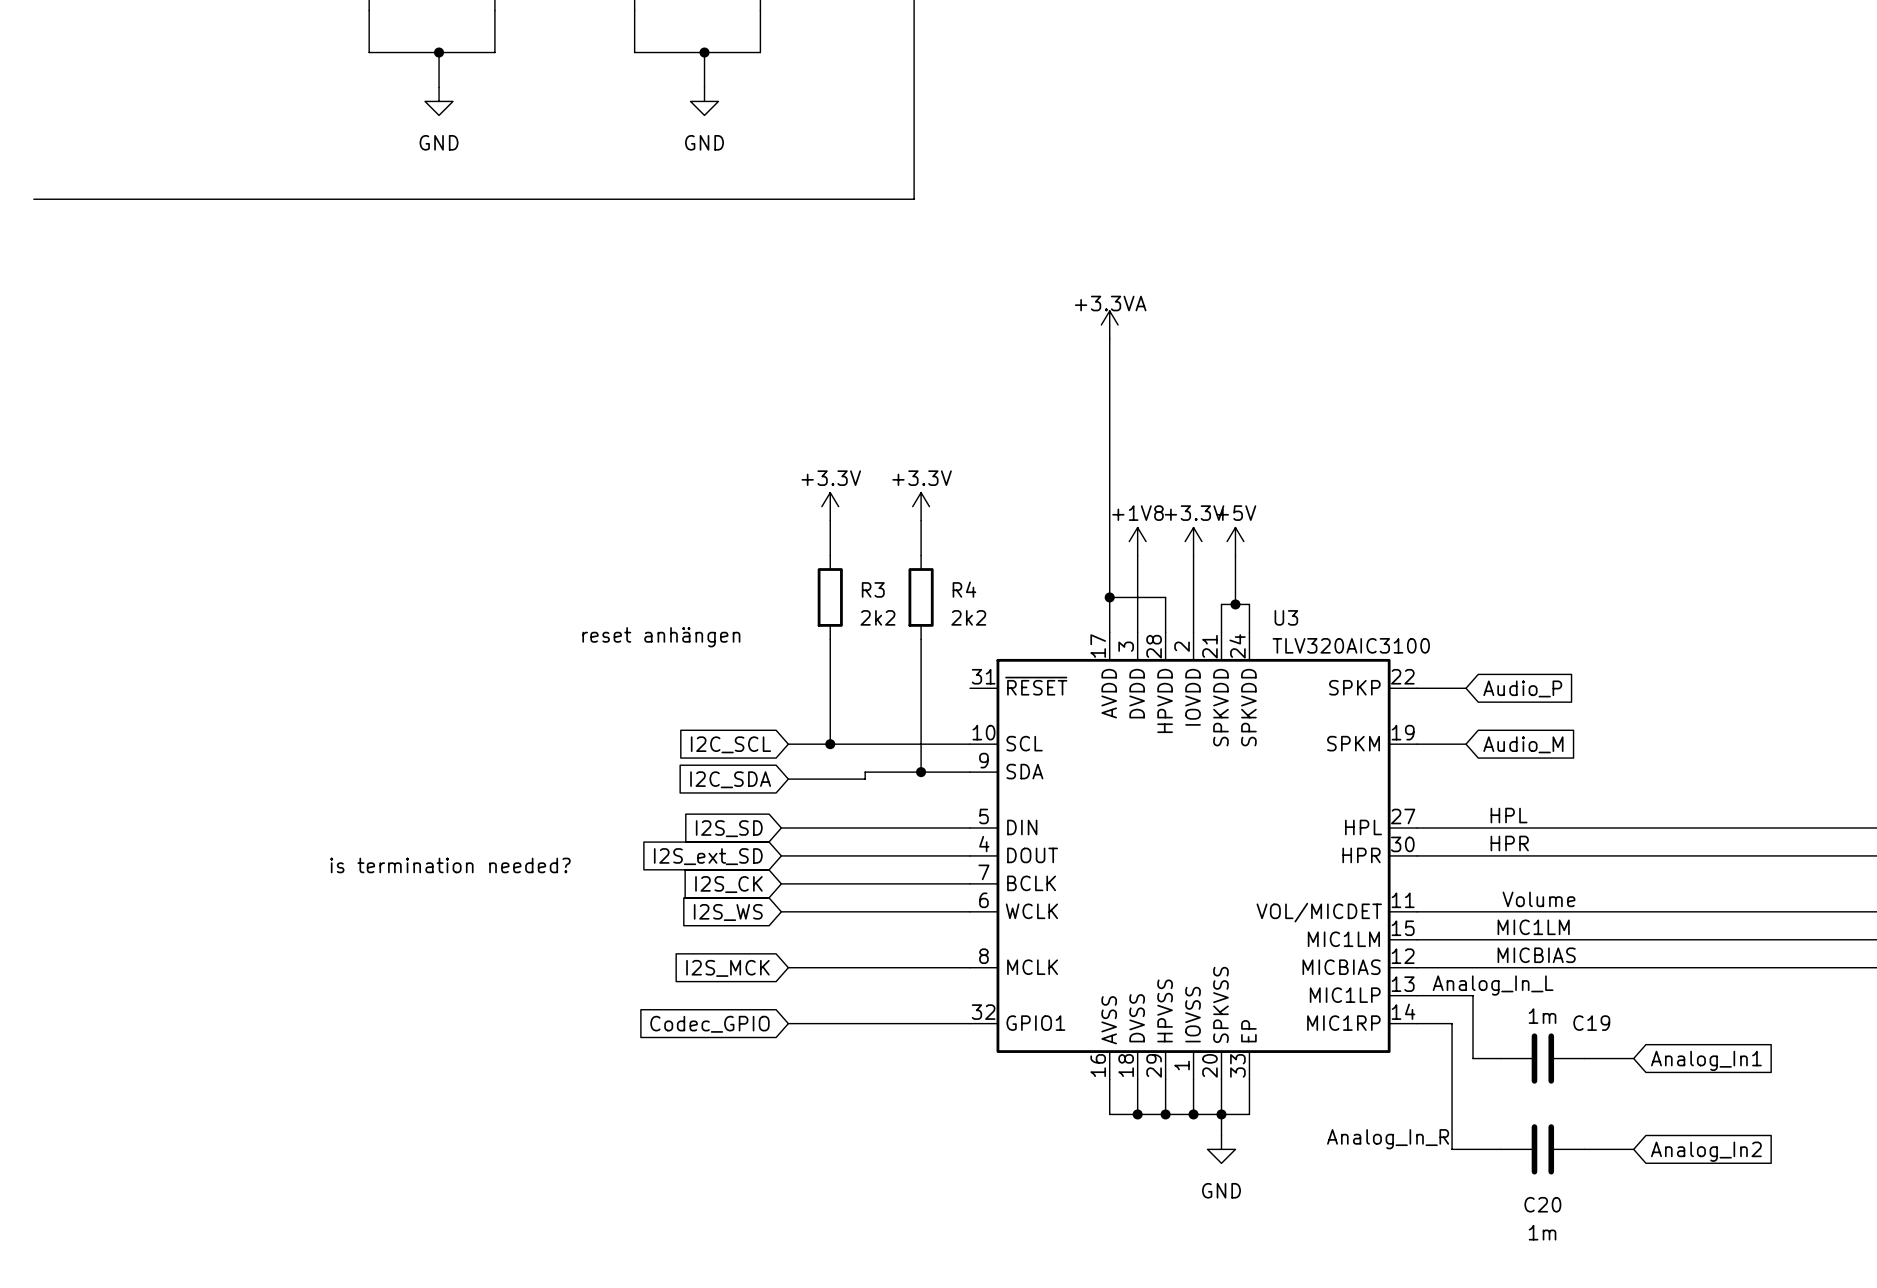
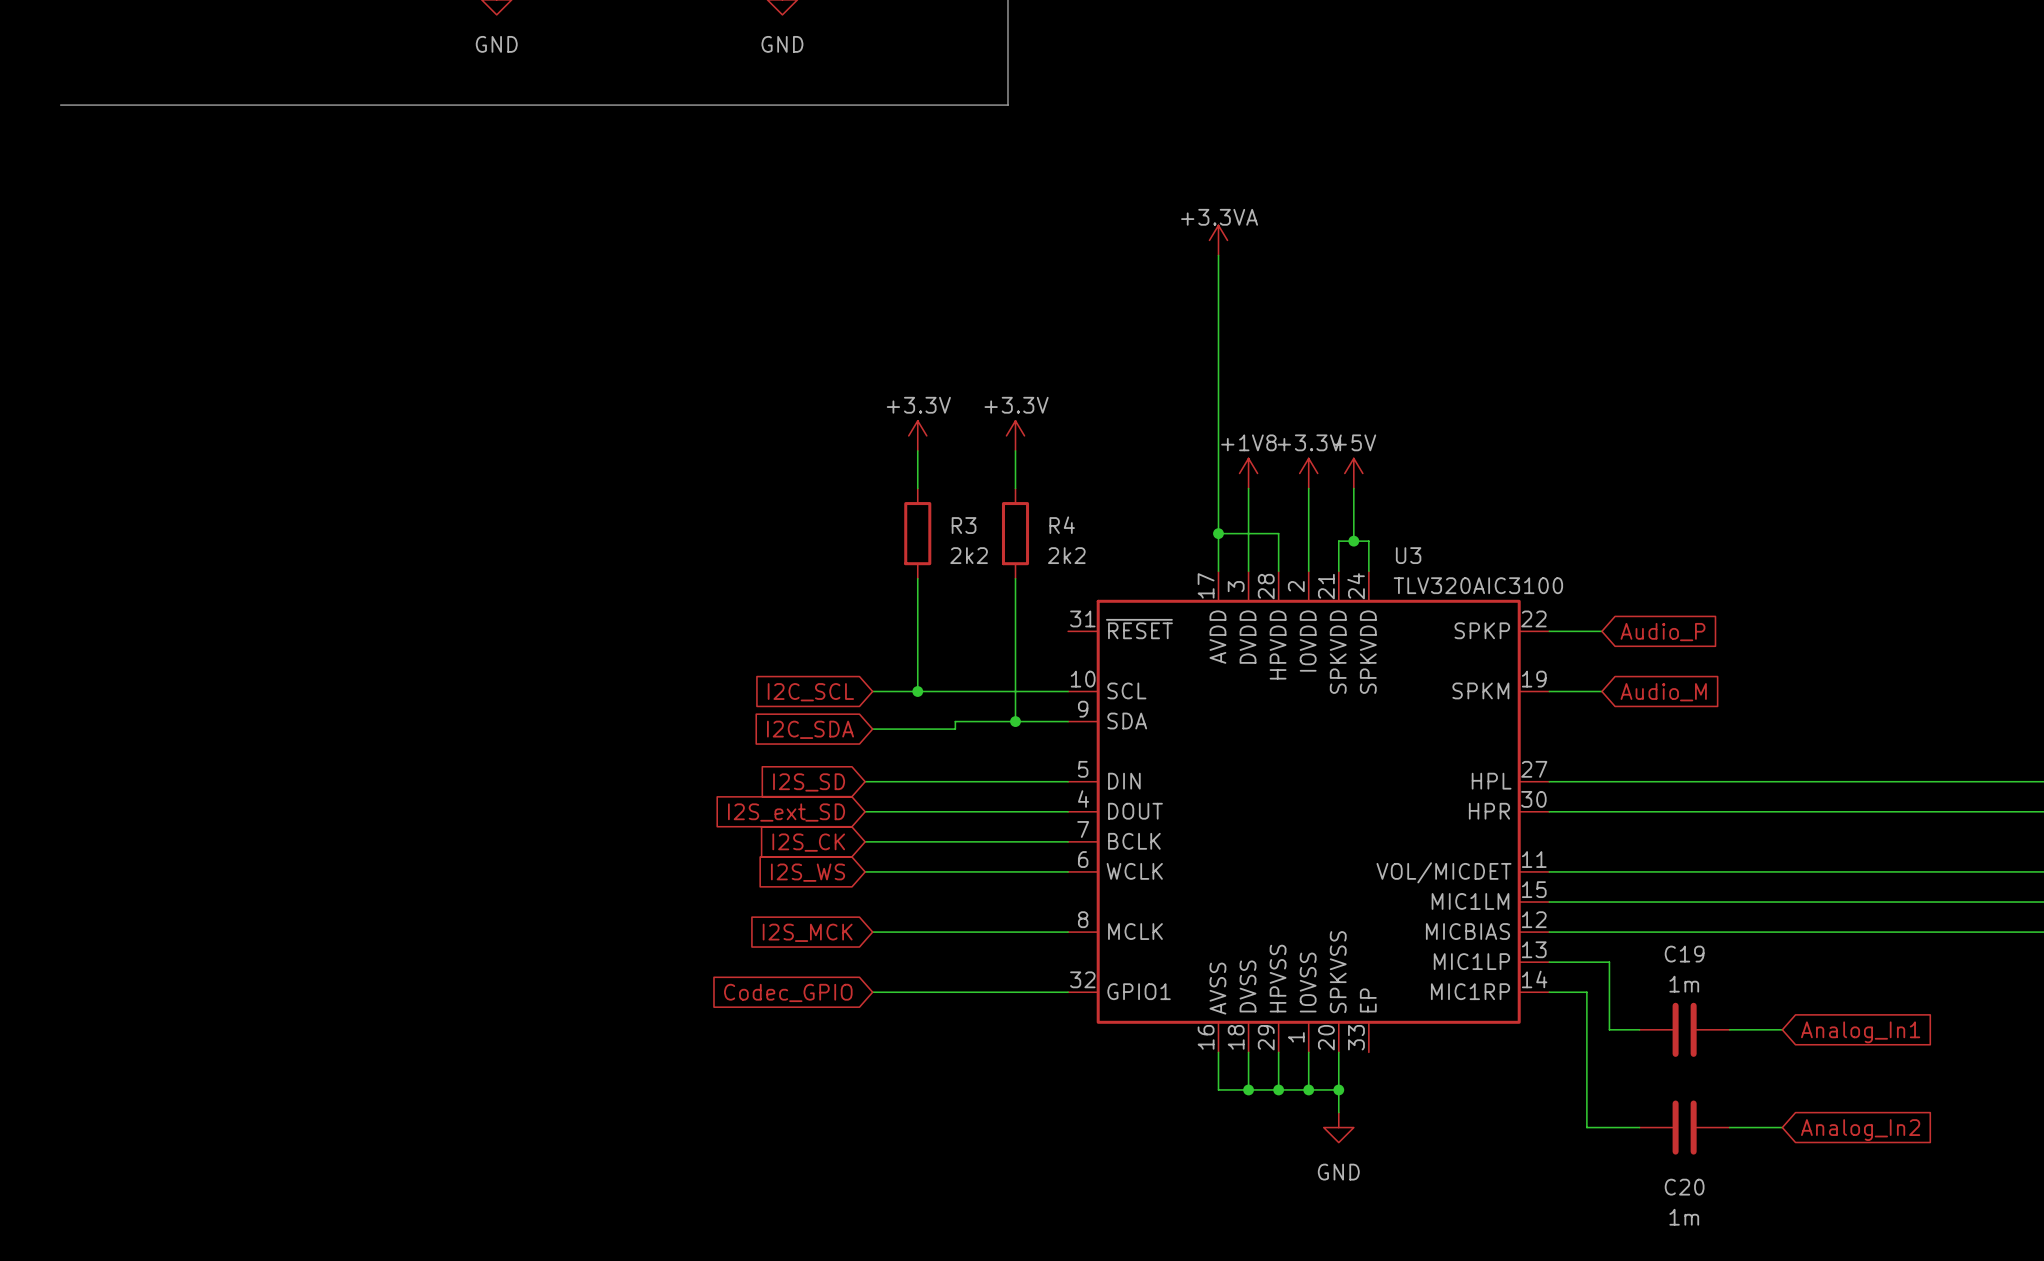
text: reset anhängen (661, 637) -> none
label: HPL (1509, 815) -> none
label: HPR (1509, 843) -> none
text: is termination needed? (450, 865) -> none
label: Volume (1538, 899) -> none
label: MIC1LM (1533, 927) -> none
label: MICBIAS (1536, 955) -> none
label: Analog_In_L (1493, 985) -> none
C19 name position: C19 (1591, 1023) -> C19 (1684, 954)
wire: (1249, 1079) (1249, 1114) (1221, 1114) -> none
label: Analog_In_R (1388, 1139) -> none

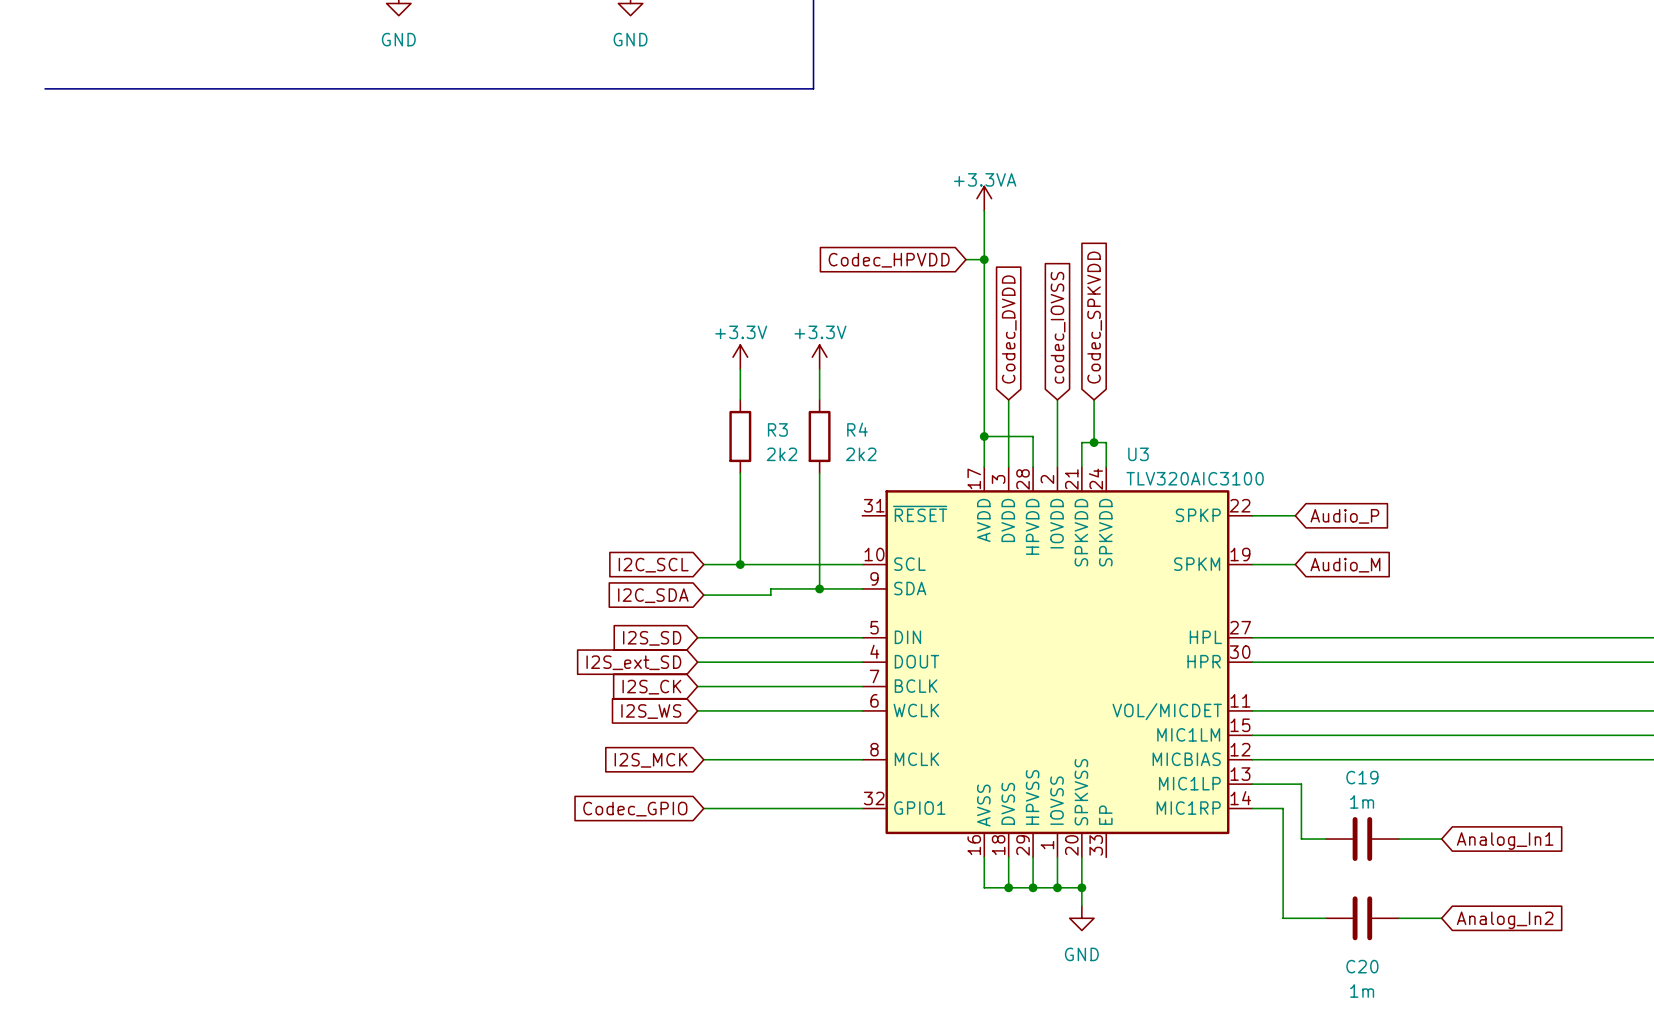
wire: none -> (965, 259) (984, 259)
junction: none -> (984, 259)
global label: none -> Codec_HPVDD (889, 260)
global label: none -> Codec_SPKVDD (1094, 317)
global label: none -> codec_IOVSS (1058, 327)
global label: none -> Codec_DVDD (1009, 329)
power symbol: +1V8 (1248, 473) -> none
power symbol: +3.3V (1308, 473) -> none
power symbol: +5V (1353, 473) -> none

